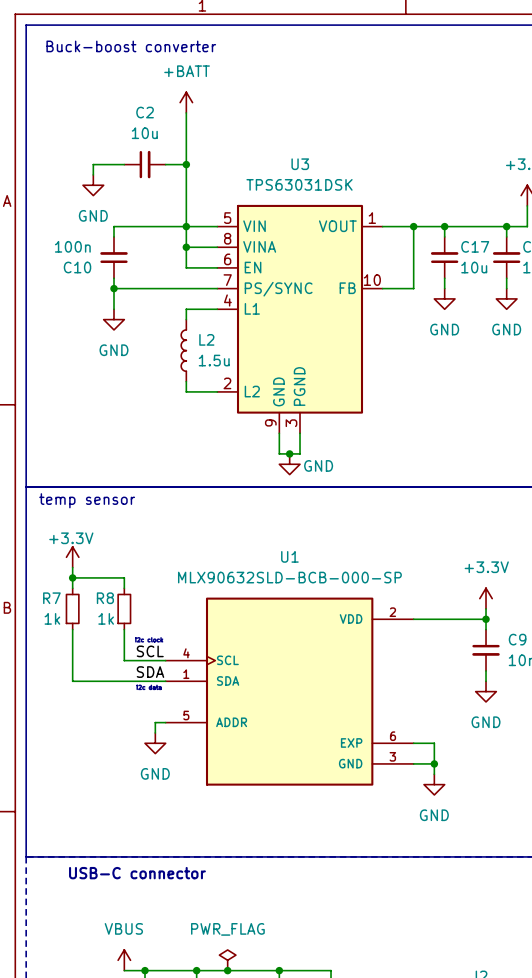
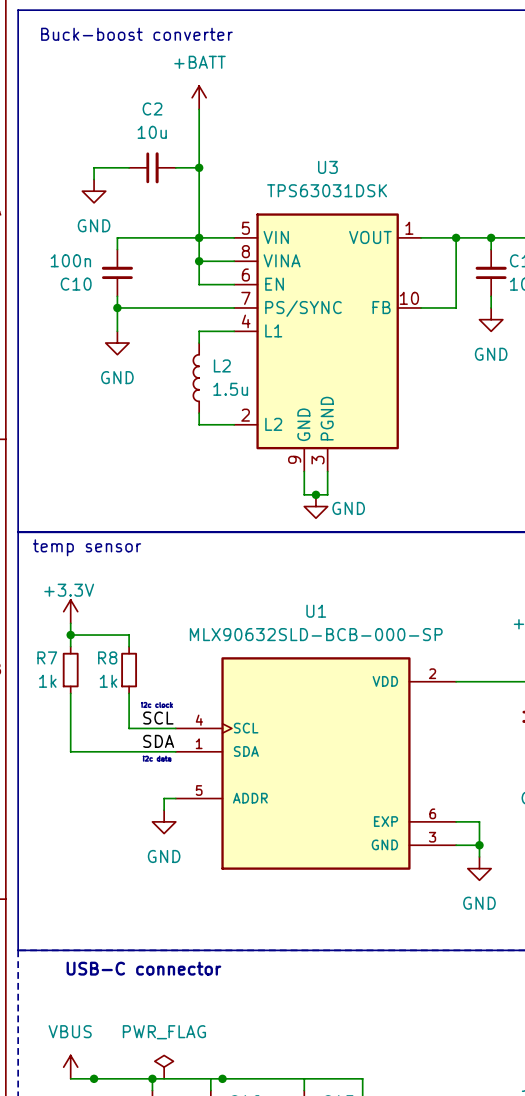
power symbol position: VBUS (124, 960) -> VBUS (70, 1067)
power symbol position: PWR_FLAG (227, 960) -> PWR_FLAG (164, 1067)
wire: none -> (70, 1078) (129, 1078)
junction: none -> (94, 1078)
junction: (196, 970) -> none
junction: none -> (222, 1078)
junction: (227, 970) -> none
junction: (279, 970) -> none

